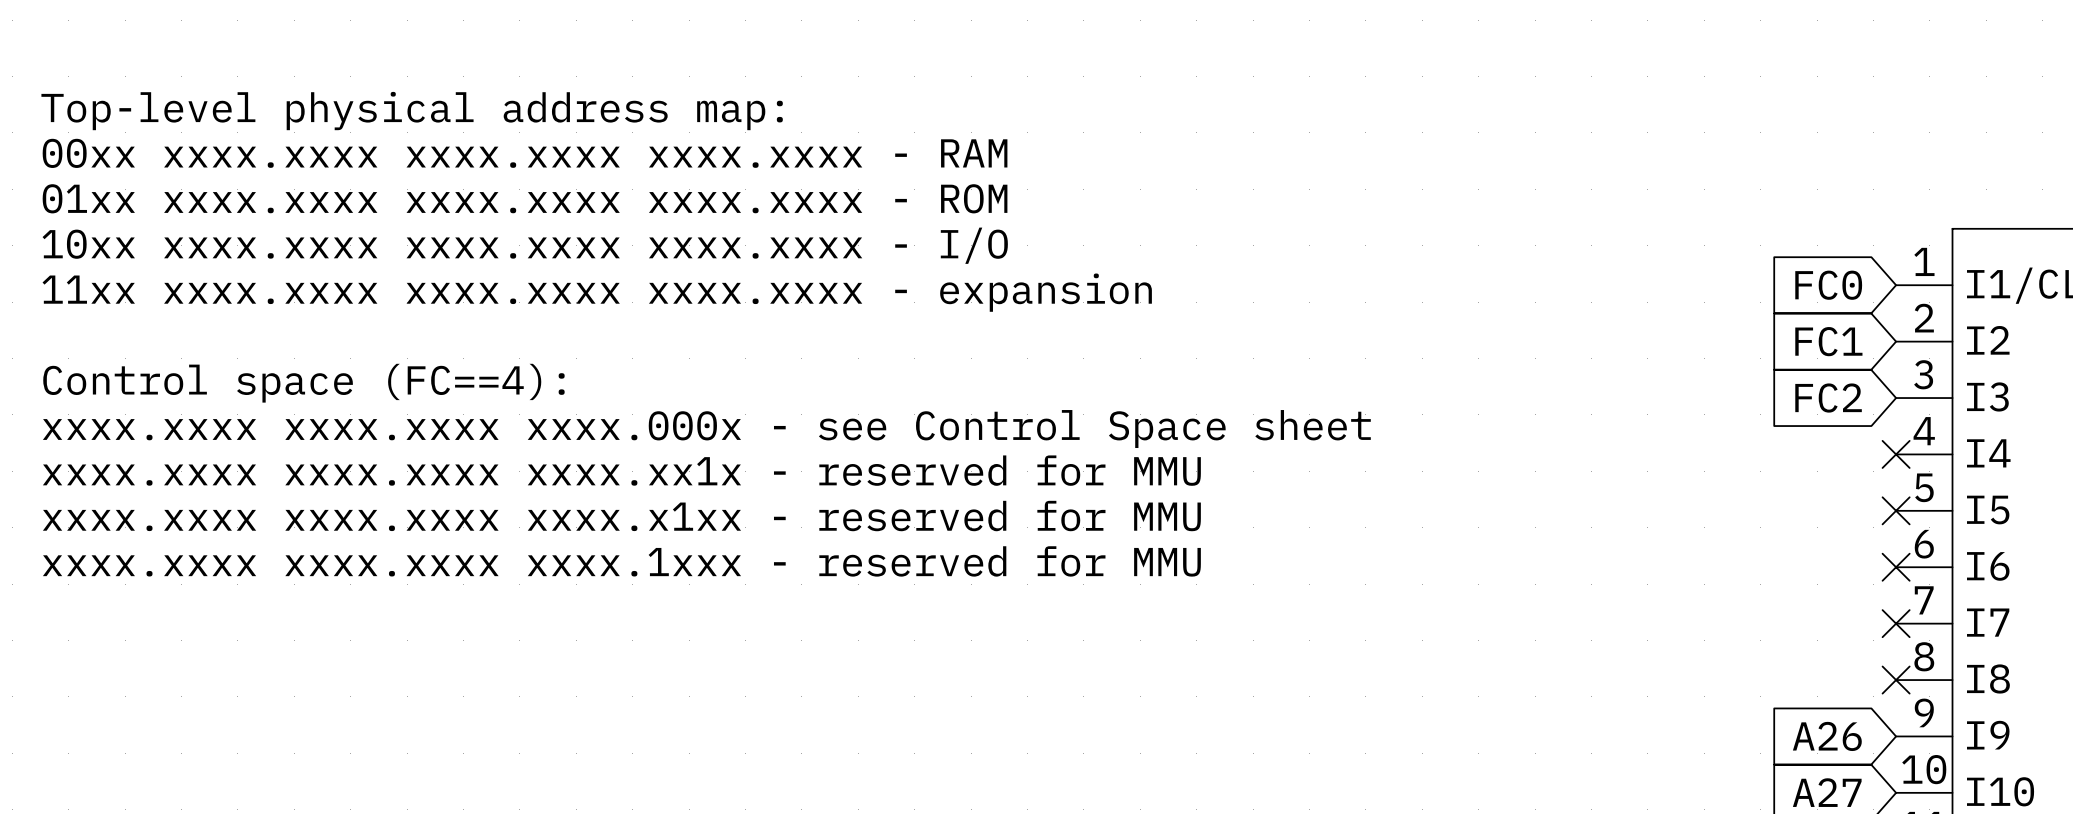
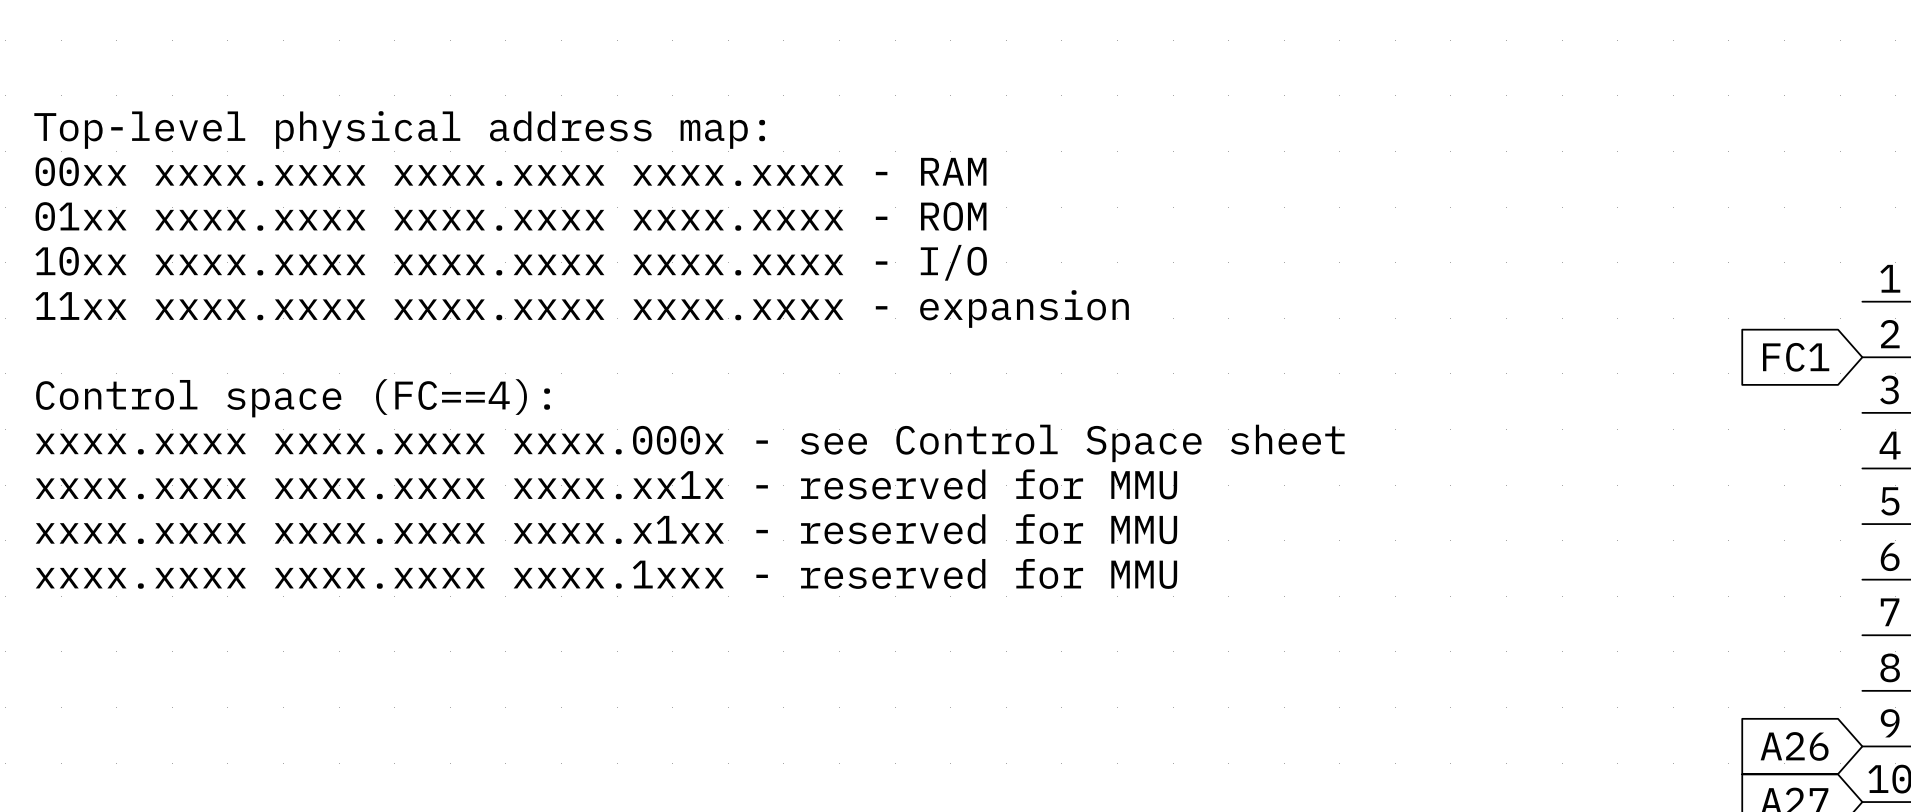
global label: FC0 (1828, 285) -> none
global label: FC2 (1828, 398) -> none
no-connect mark: (1896, 454) -> none
no-connect mark: (1896, 510) -> none
no-connect mark: (1896, 567) -> none
no-connect mark: (1896, 623) -> none
no-connect mark: (1896, 680) -> none

